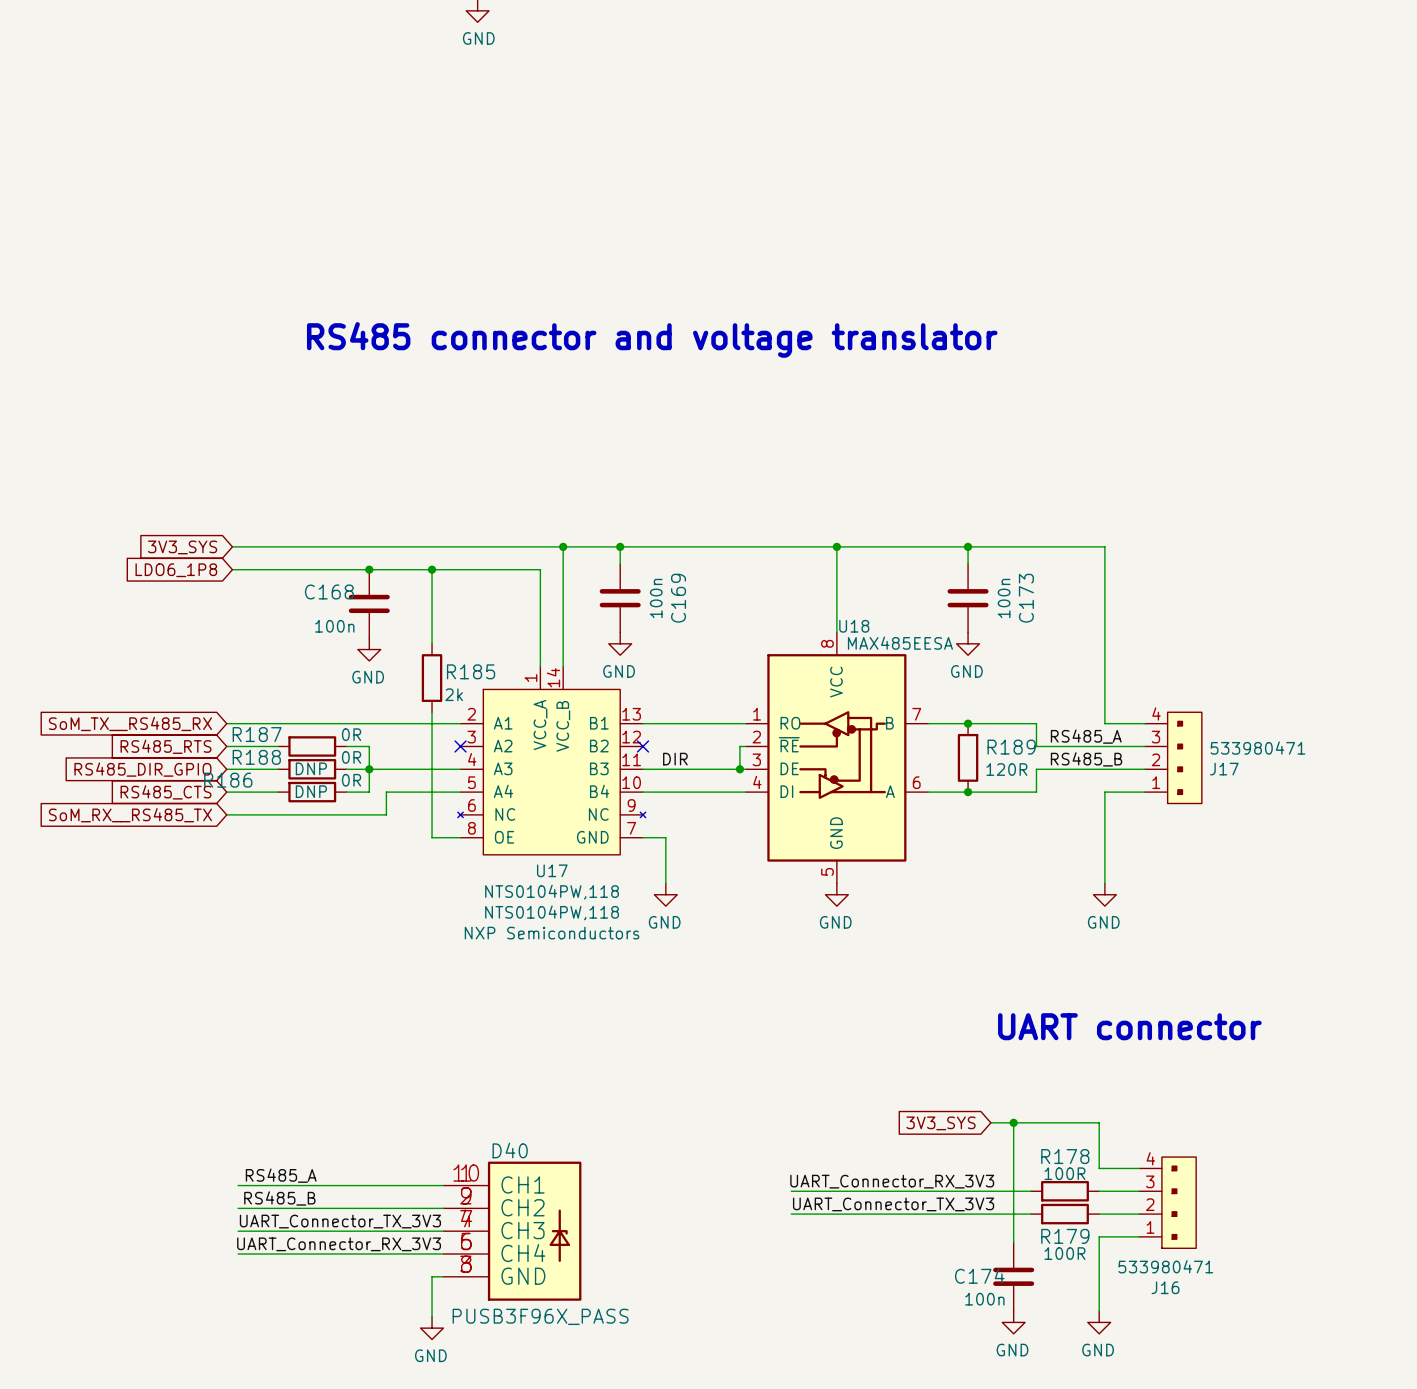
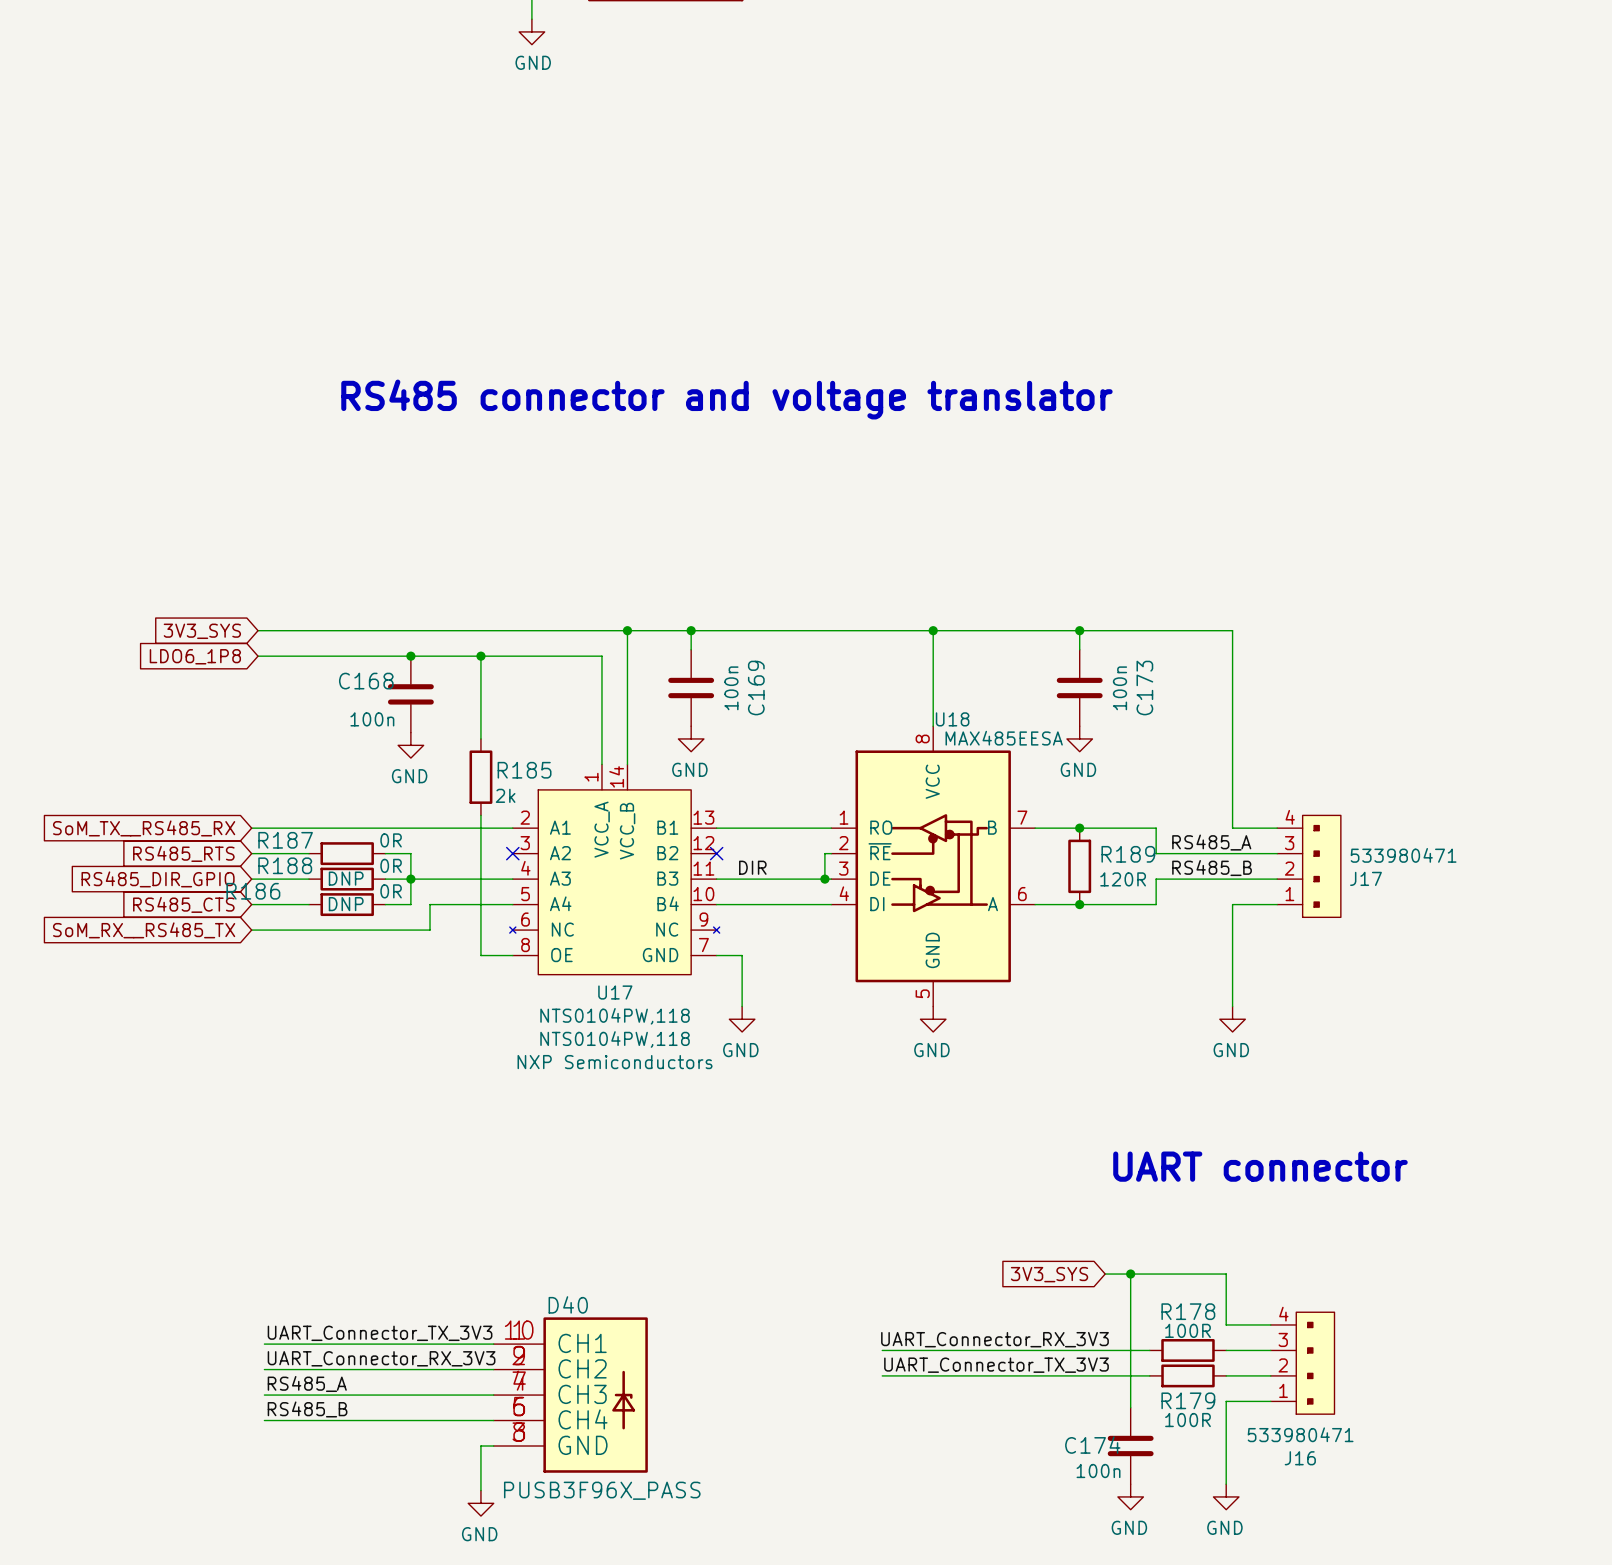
label position: RS485_A (281, 1175) -> RS485_A (307, 1383)
label position: RS485_B (279, 1198) -> RS485_B (307, 1409)
label position: UART_Connector_TX_3V3 (340, 1221) -> UART_Connector_TX_3V3 (380, 1333)
label position: UART_Connector_RX_3V3 (339, 1244) -> UART_Connector_RX_3V3 (381, 1358)

